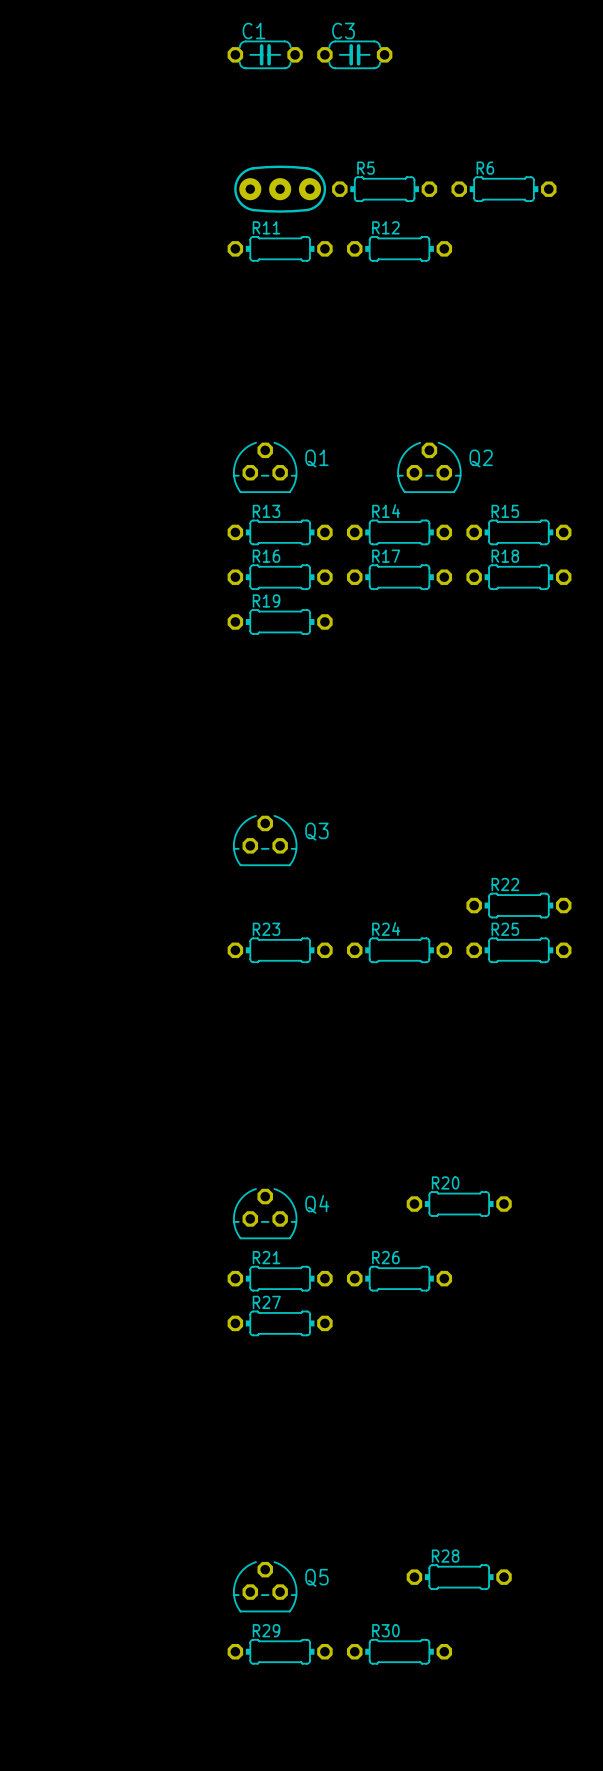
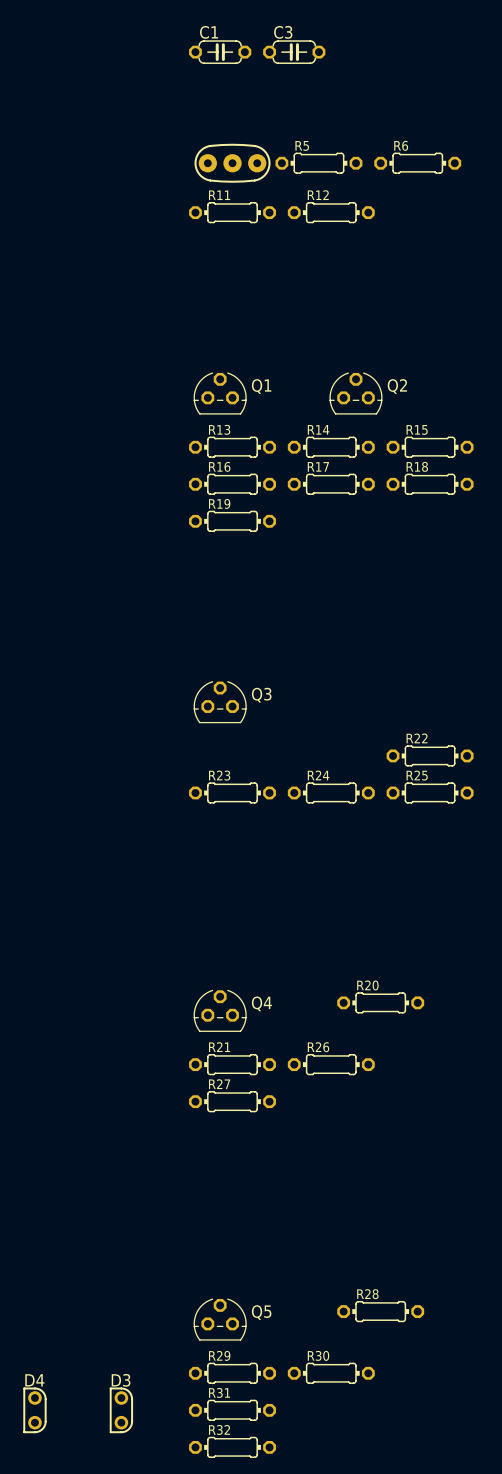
D4: none -> (34, 1410)
D3: none -> (121, 1410)
R31: none -> (232, 1410)
R32: none -> (232, 1447)

